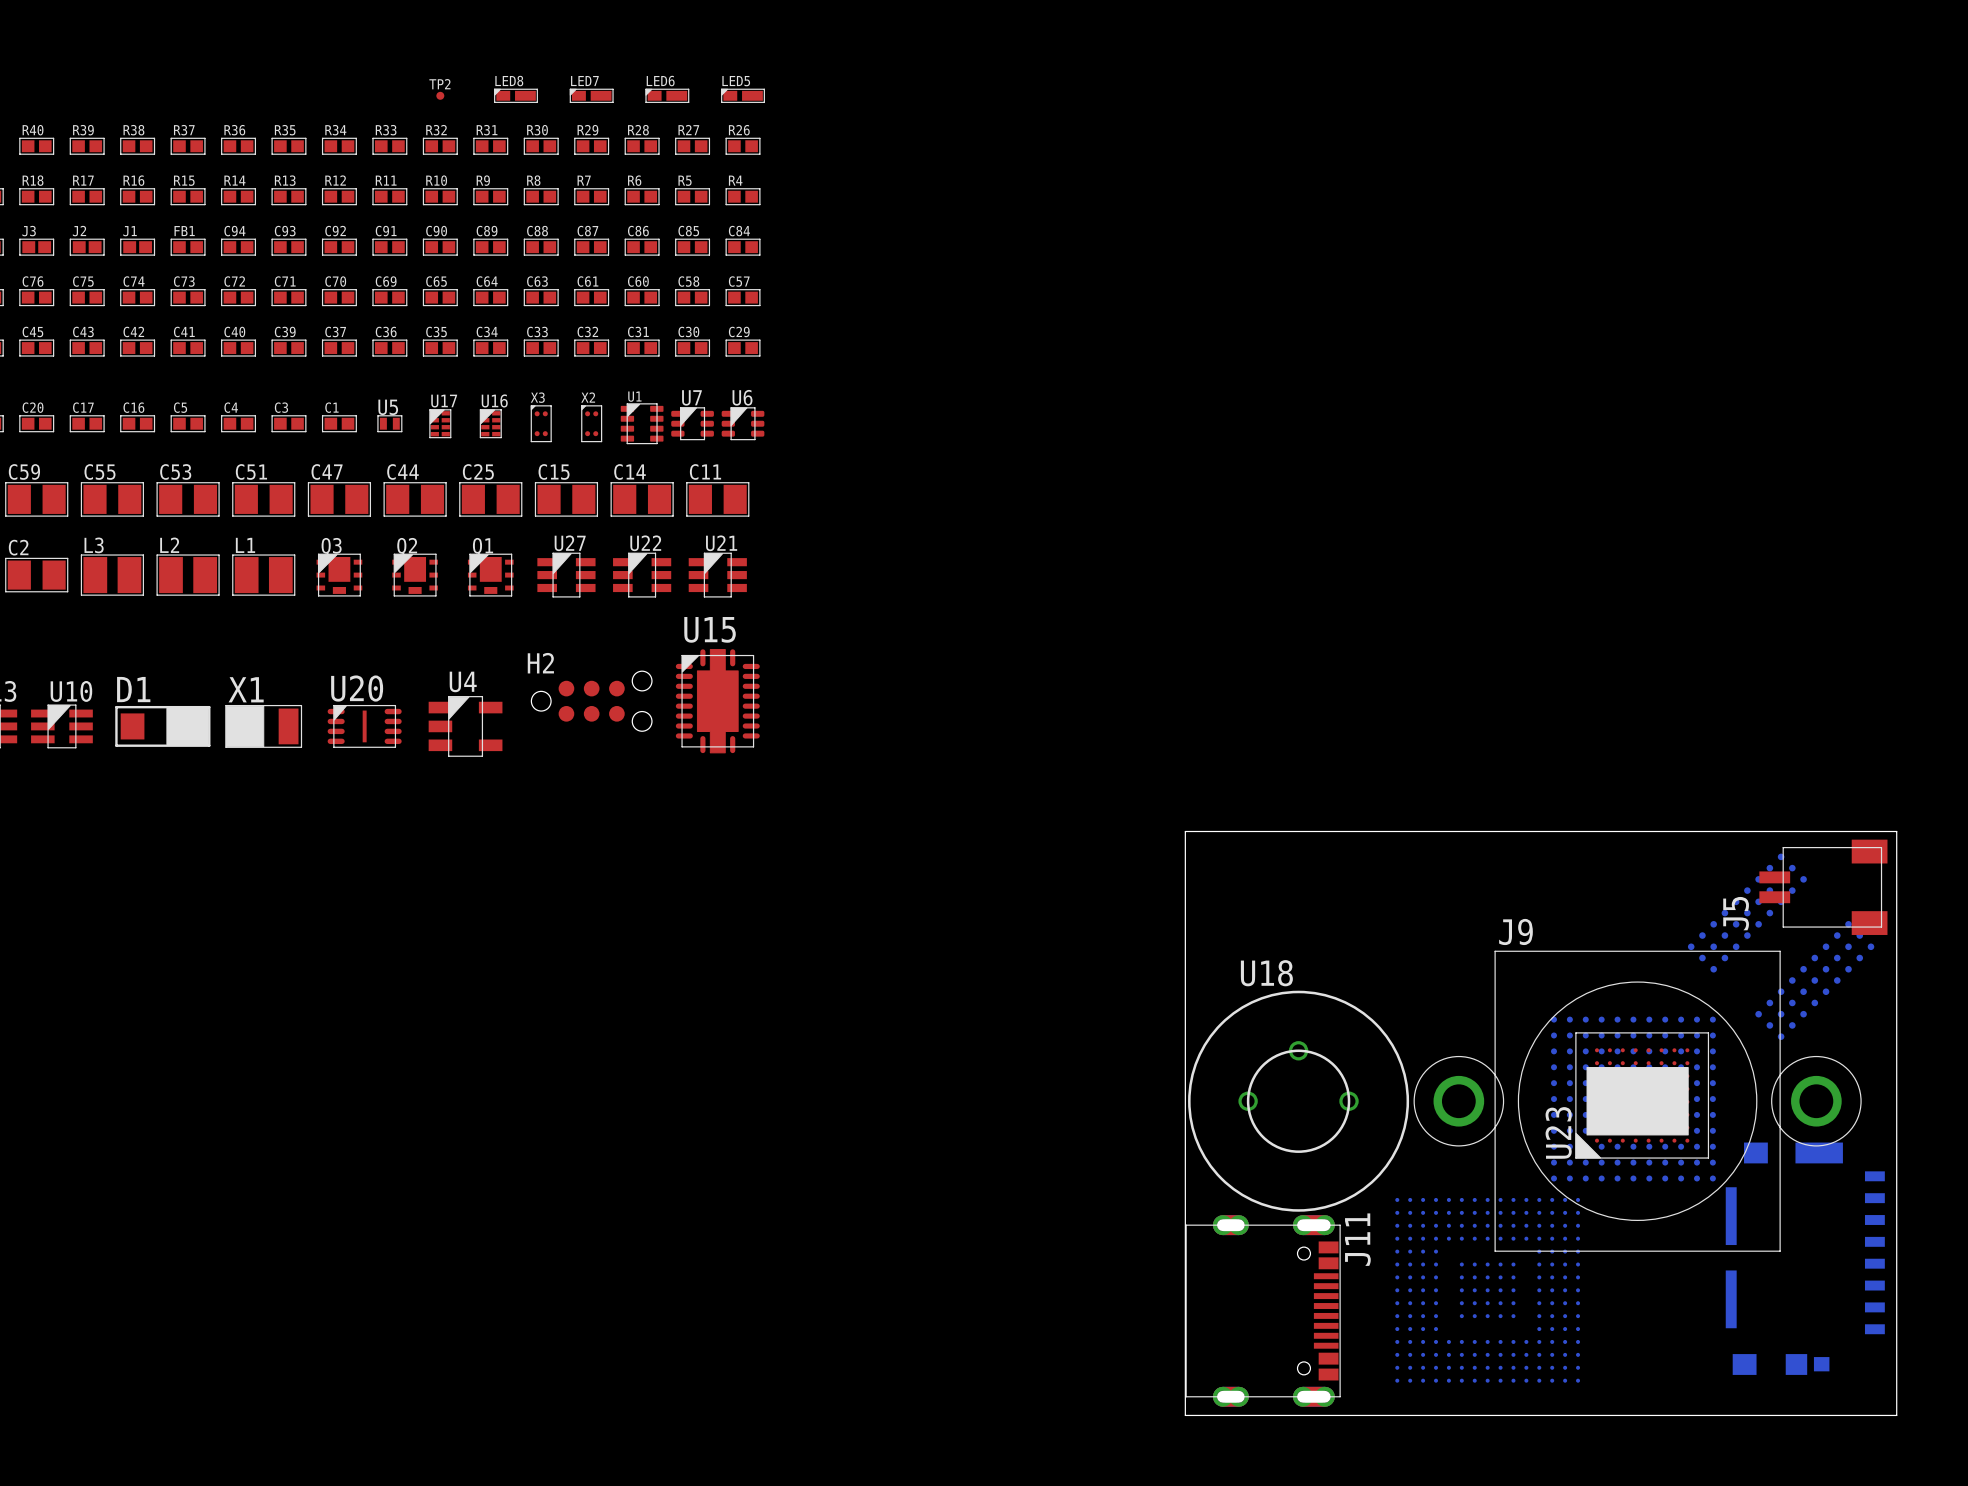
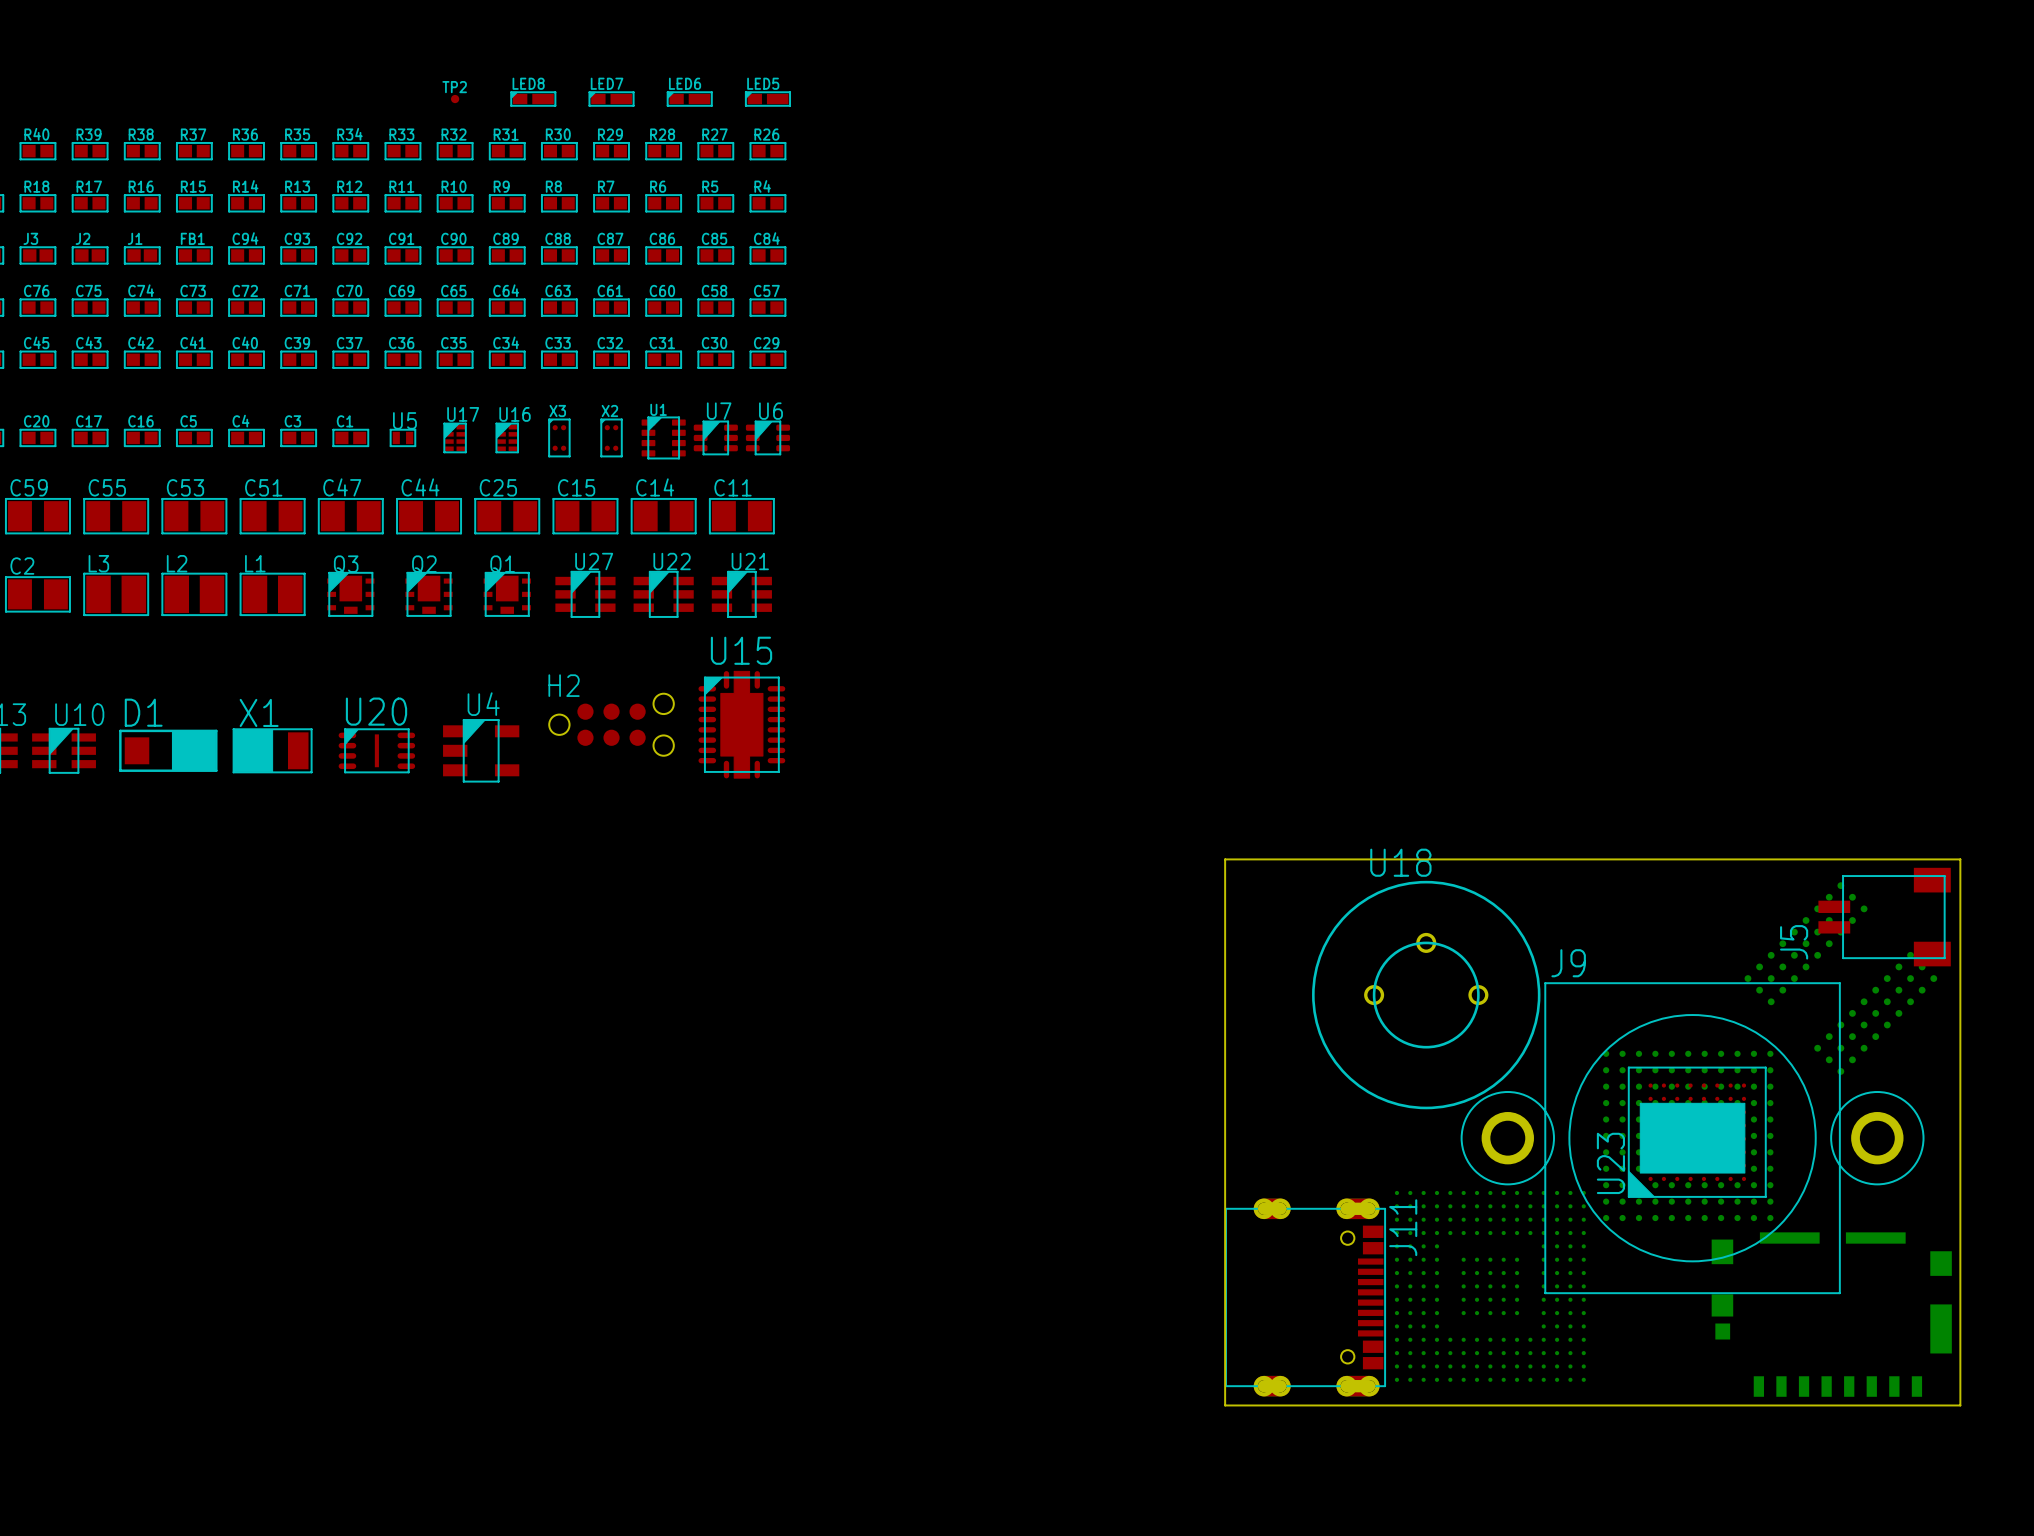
U18 position: (1298, 1101) -> (1426, 995)
part rotation: 0° (1805, 1258) -> 90° clockwise (1831, 1314)
part position: (1487, 1290) -> (1490, 1286)
J11 position: (1263, 1310) -> (1305, 1297)
board edge: (1185, 1359) (1185, 1415) (1896, 1415) (1896, 1359) -> (1225, 1405) (1960, 1405)

